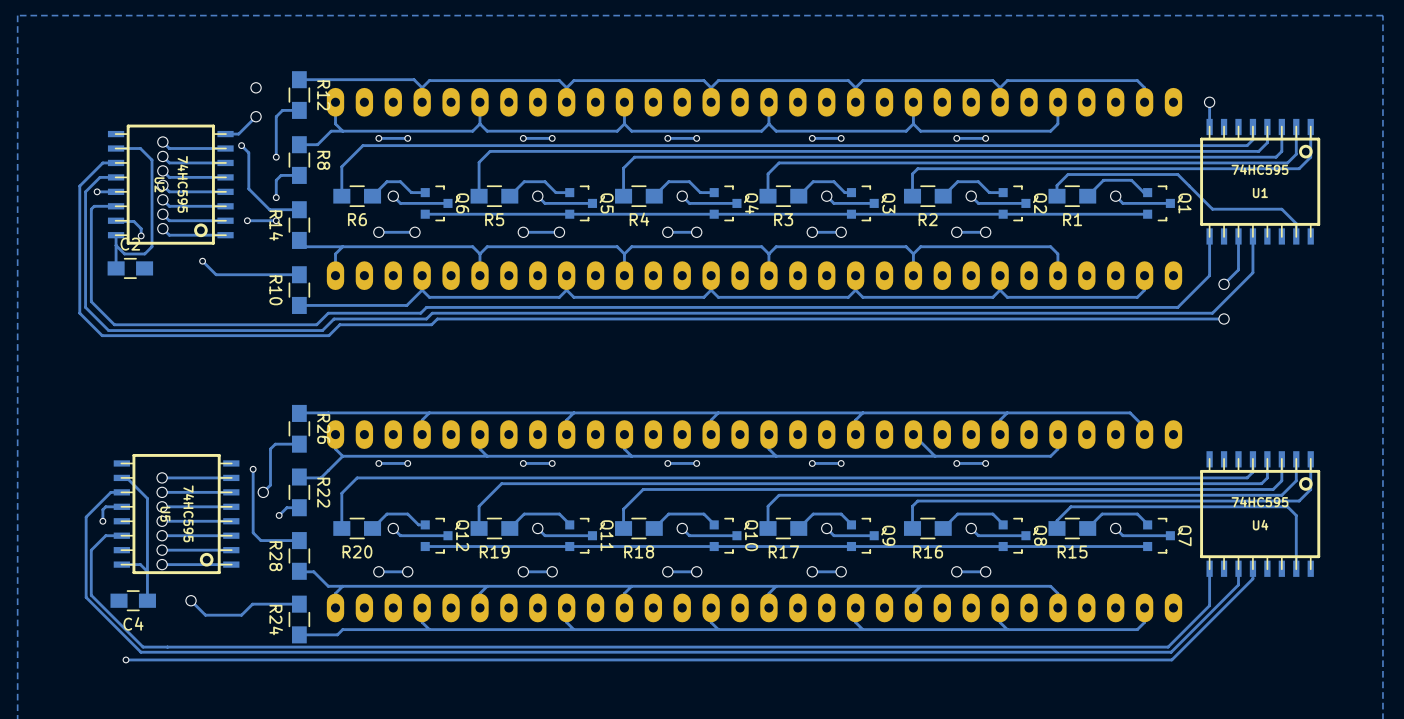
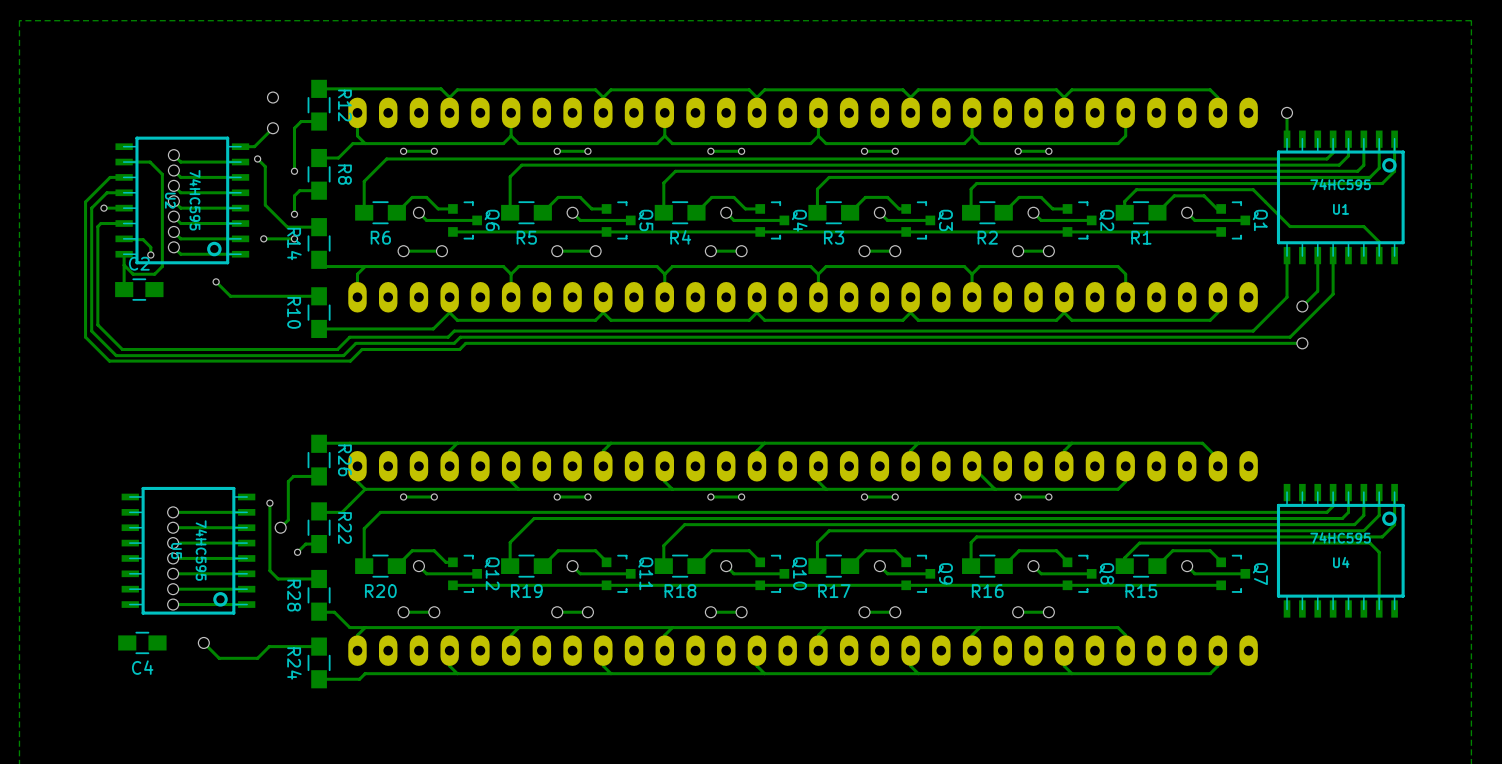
track: (121, 477) (126, 477) (147, 498) (147, 600) -> none
track: (121, 492) (110, 492) (86, 517) (86, 597) (140, 652) (1171, 652) (1238, 584) (1238, 568) -> none
track: (121, 506) (105, 506) (102, 509) (102, 521) -> none
via: (102, 521) -> none
track: (126, 535) (105, 535) (91, 550) (91, 595) (143, 647) (1168, 647) (1209, 605) (1209, 568) -> none
track: (121, 564) (140, 564) (147, 571) -> none
track: (1252, 568) (1252, 578) (1171, 659) (126, 659) -> none
via: (126, 659) -> none

